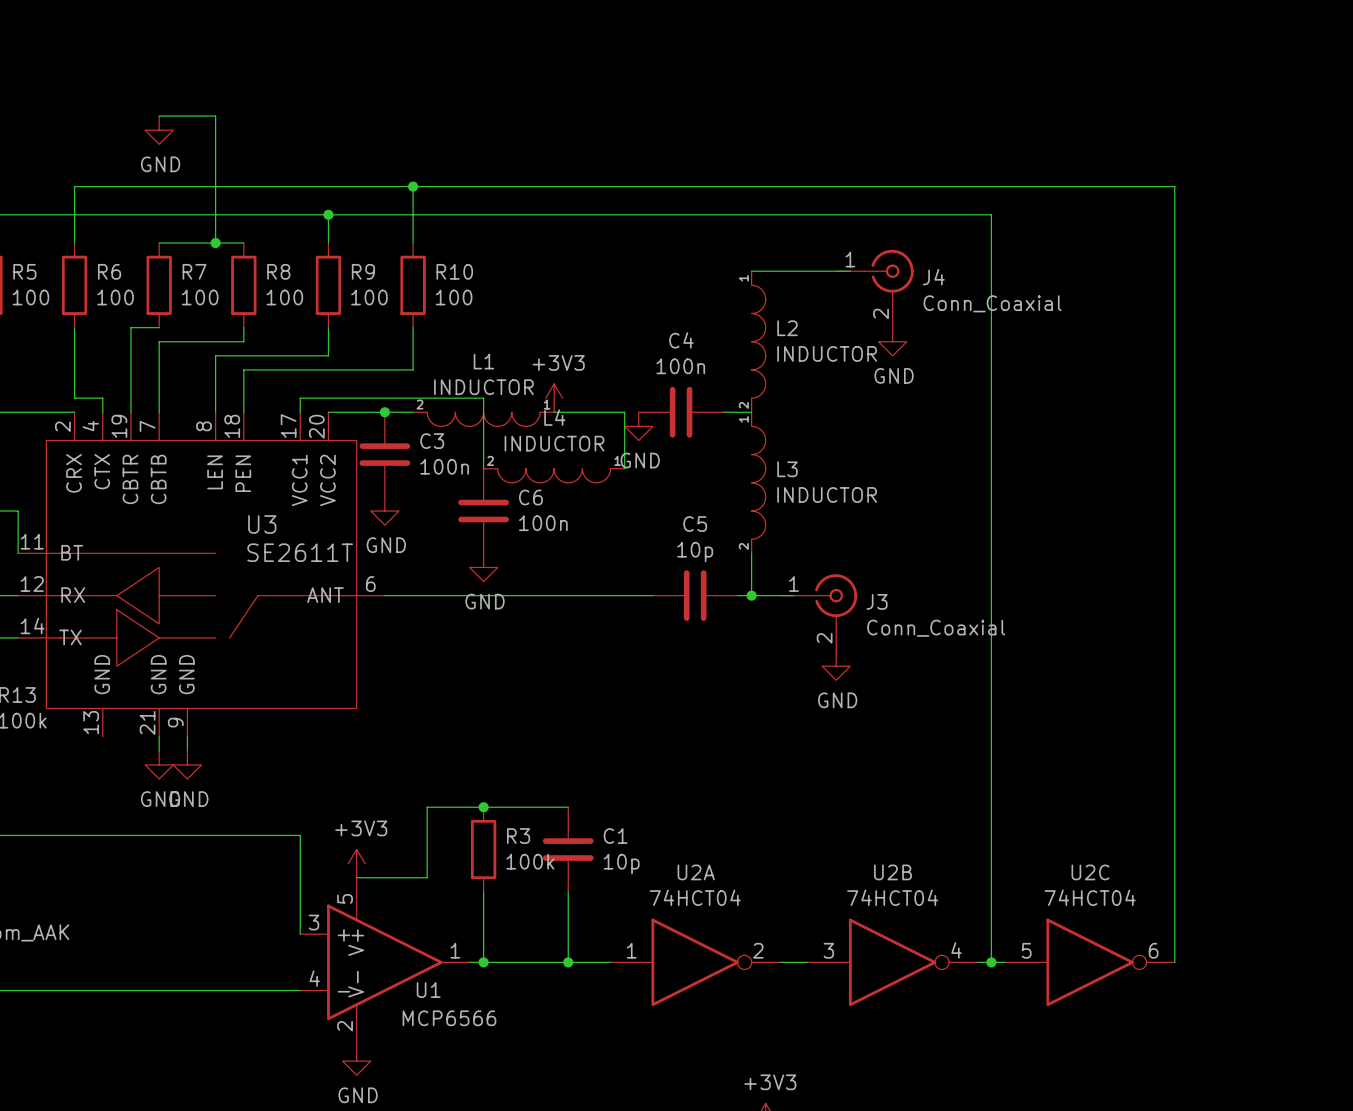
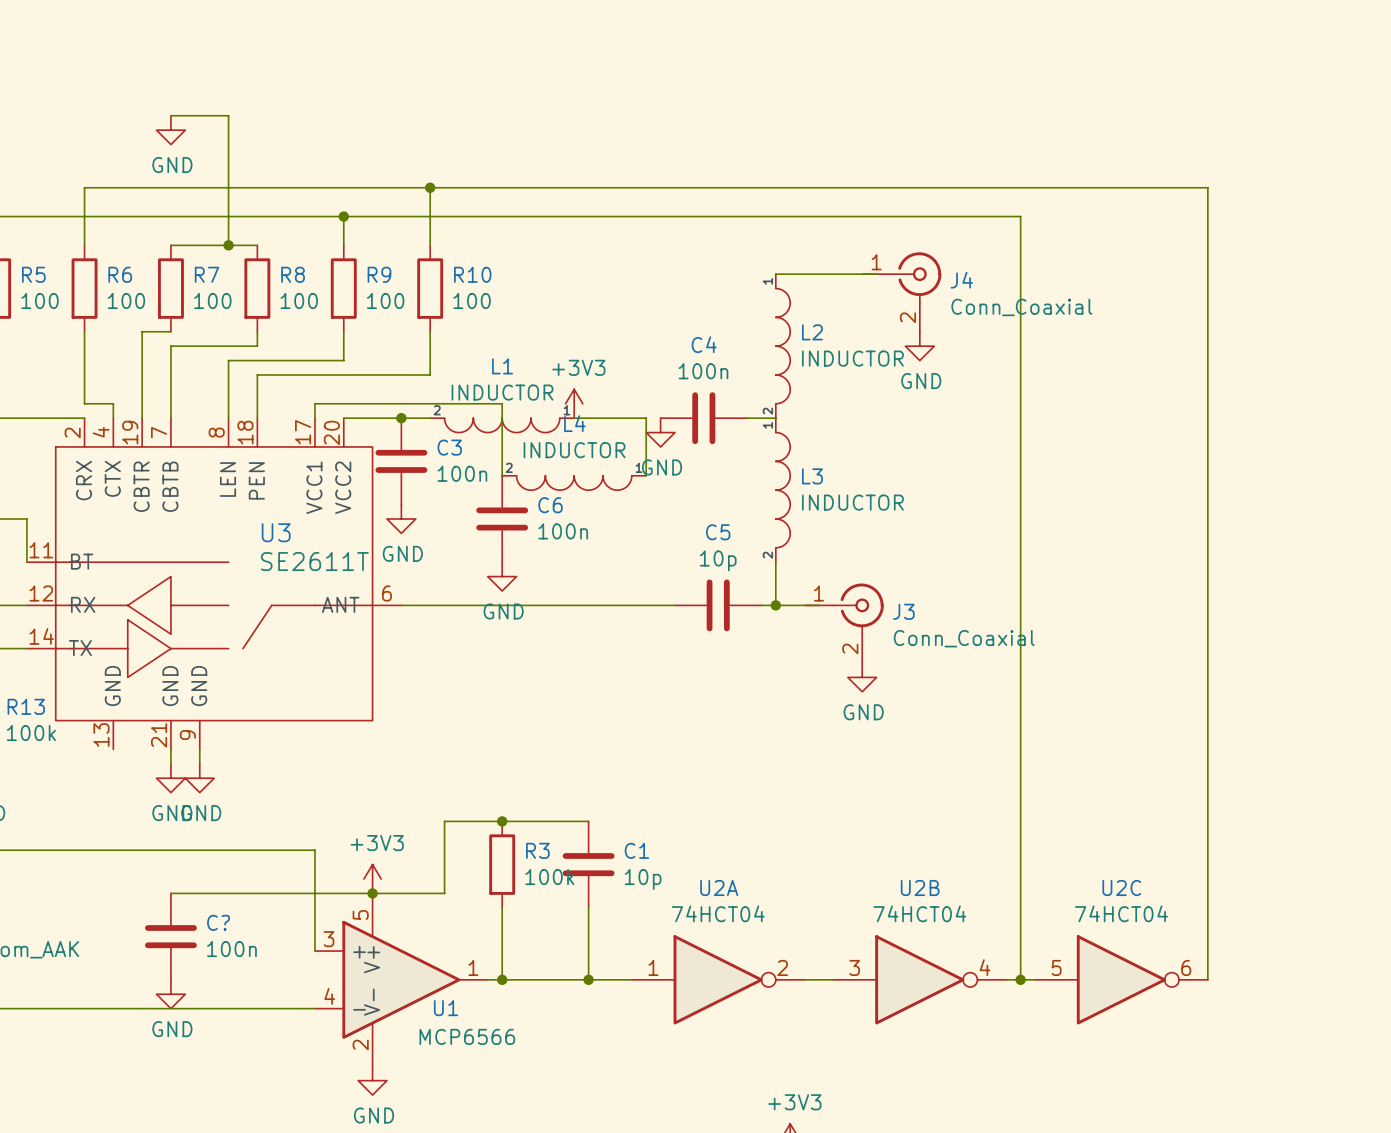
wire: none -> (170, 893) (372, 893)
junction: none -> (372, 893)
C?: none -> 100n (170, 936)
power symbol: none -> GND (170, 994)

